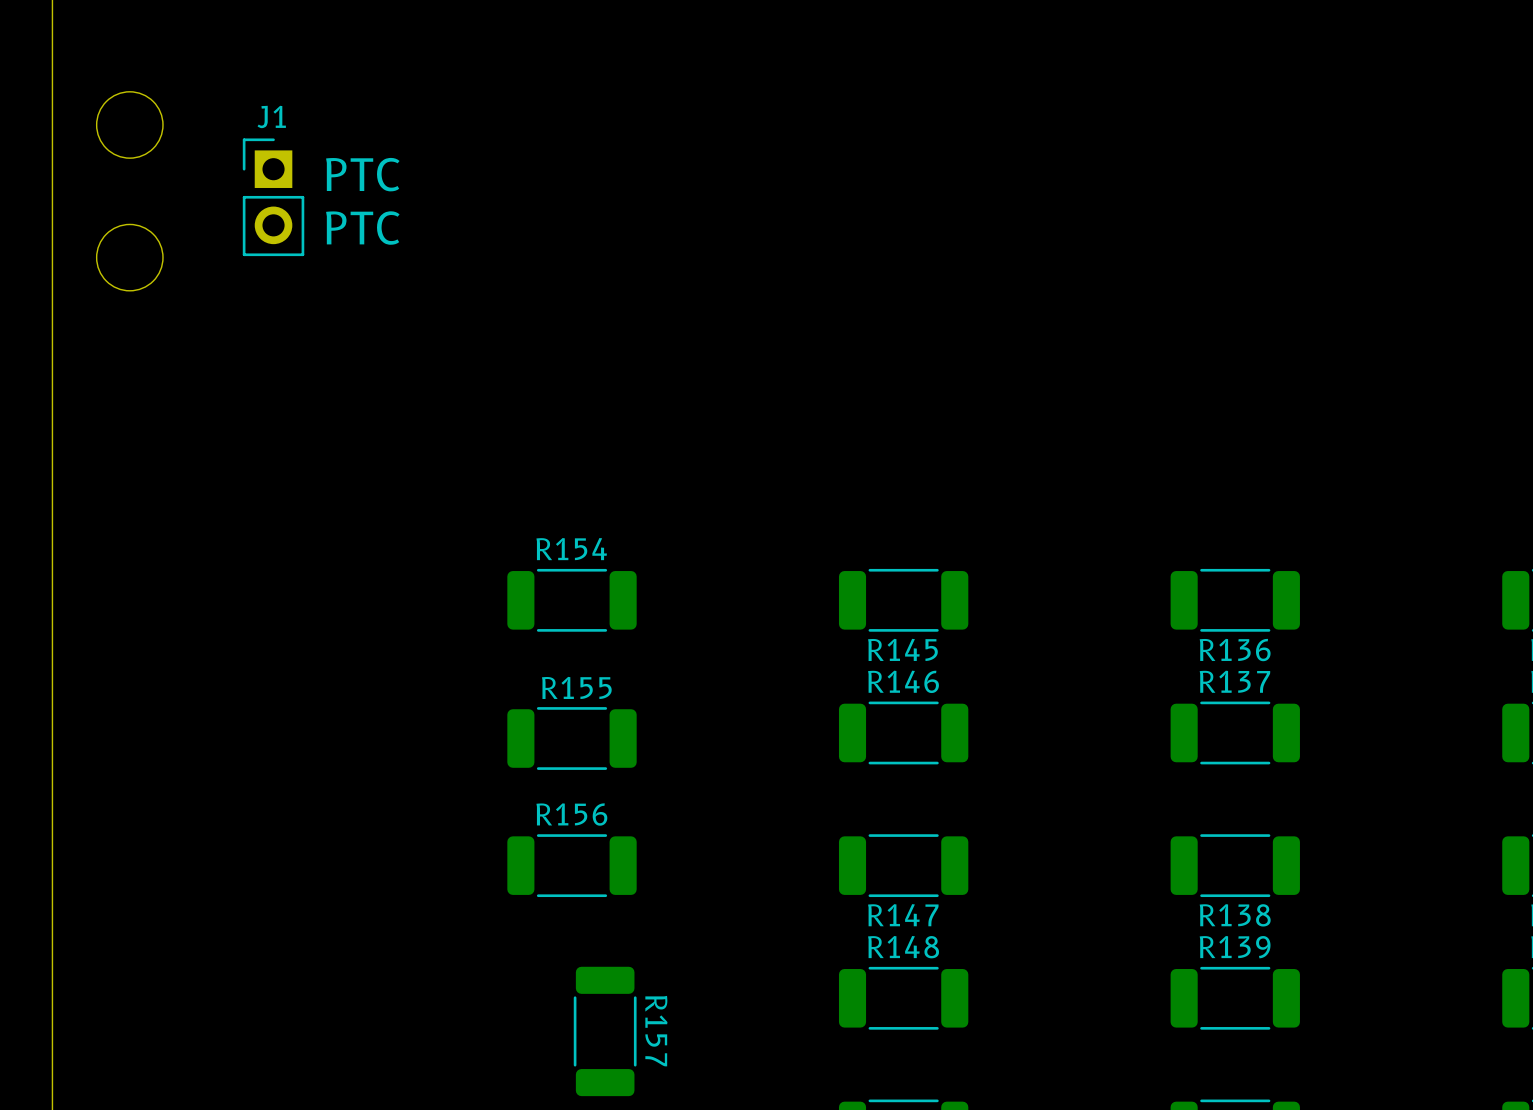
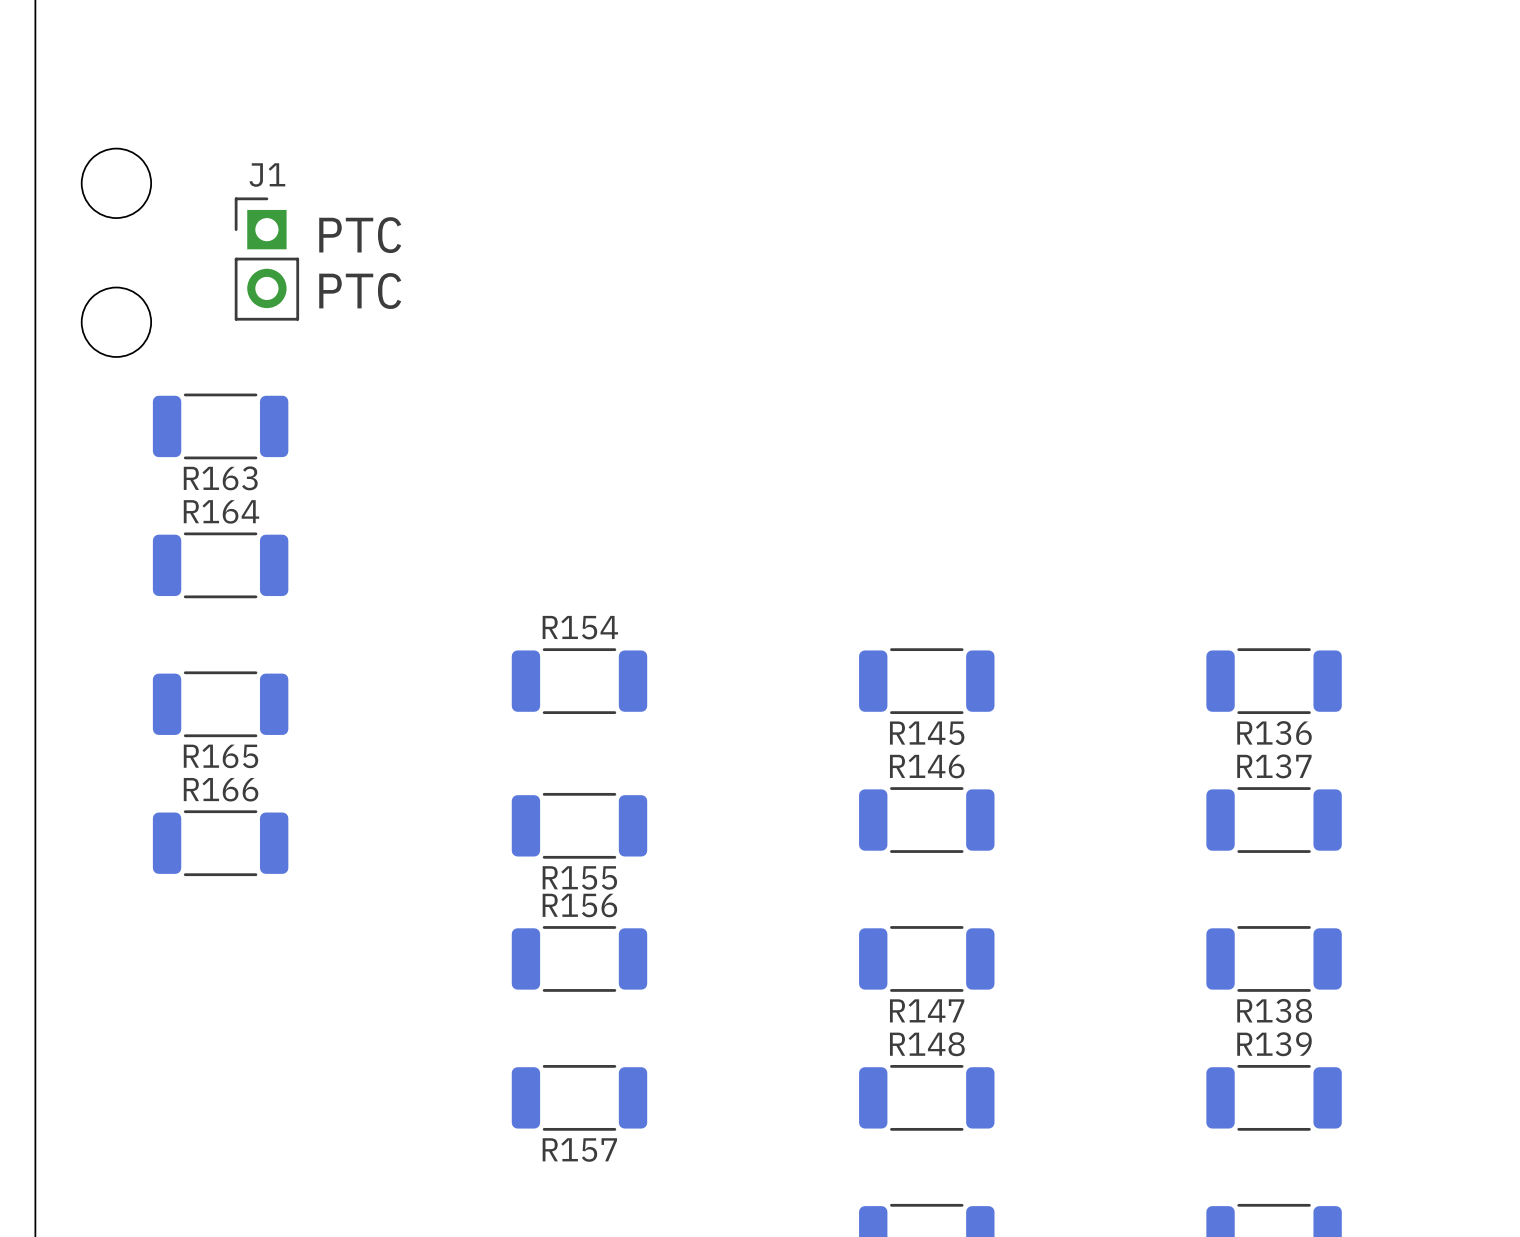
R163: none -> (220, 426)
R164: none -> (220, 565)
R165: none -> (220, 704)
R155 name position: R155 (576, 687) -> R155 (579, 877)
R166: none -> (220, 843)
R157 rotation: 0° (605, 1031) -> 90° clockwise (579, 1097)

